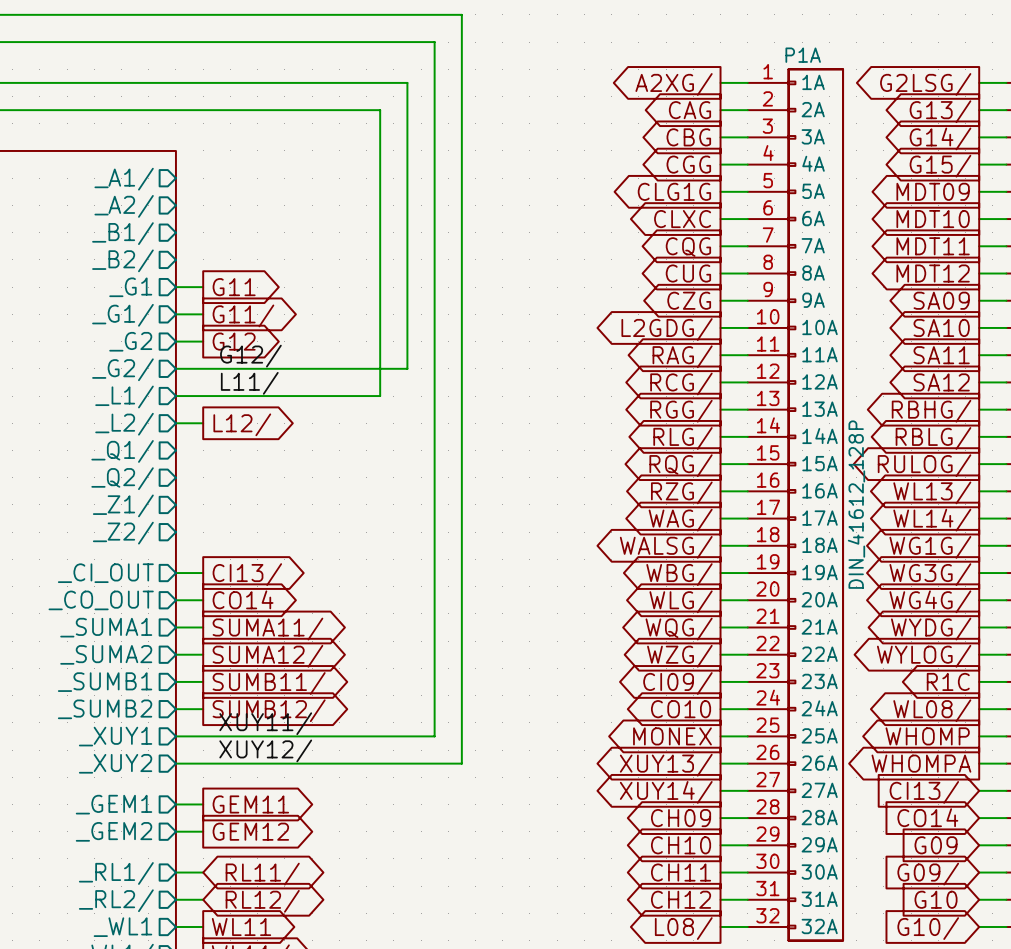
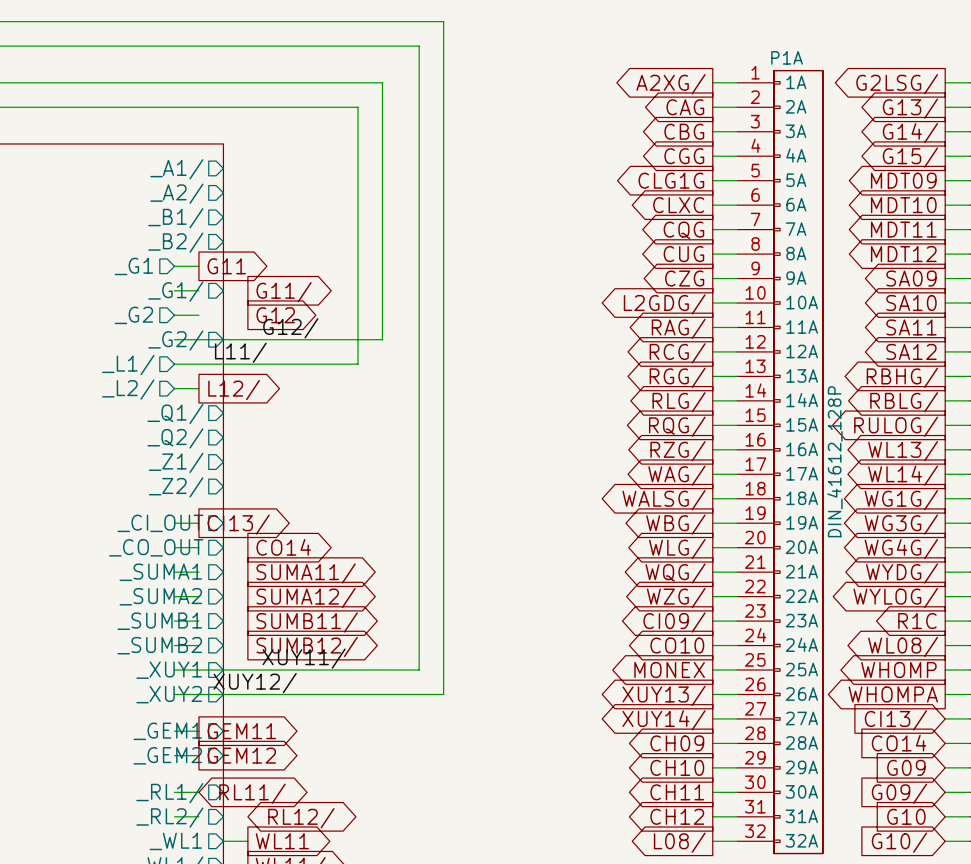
wire: (421, 14) (461, 14) (461, 763) (421, 763) -> (443, 21) (443, 694)
wire: (393, 42) (434, 42) (434, 736) (393, 736) -> (419, 46) (419, 670)
wire: (352, 82) (407, 82) (407, 368) (352, 368) -> (382, 82) (382, 339)
wire: (325, 110) (380, 110) (380, 396) (325, 396) -> (358, 107) (358, 364)
sheet pin position: _G1 (130, 287) -> _G1 (133, 266)
wire: (175, 287) (203, 287) -> (174, 266) (198, 266)
global label position: G11 (234, 287) -> G11 (226, 266)
wire: (175, 314) (203, 314) -> (174, 290) (198, 290)
sheet pin position: _G2 (130, 341) -> _G2 (133, 315)
wire: (175, 341) (203, 341) -> (174, 315) (198, 315)
wire: none -> (174, 339) (223, 339)
label position: L11/ (249, 383) -> L11/ (240, 352)
wire: none -> (174, 364) (223, 364)
sheet pin position: _L1/ (124, 396) -> _L1/ (128, 365)
wire: (175, 423) (203, 423) -> (174, 388) (198, 388)
sheet pin position: _L2/ (124, 424) -> _L2/ (128, 389)
global label position: L12/ (242, 424) -> L12/ (234, 390)
wire: (175, 573) (203, 573) -> (174, 523) (198, 523)
global label position: CI13/ (247, 574) -> CI13/ (238, 524)
wire: (175, 600) (203, 600) -> (174, 547) (198, 547)
wire: (175, 627) (203, 627) -> (174, 572) (198, 572)
wire: (175, 654) (203, 654) -> (174, 596) (198, 596)
wire: (175, 681) (203, 681) -> (174, 621) (198, 621)
wire: (175, 709) (203, 709) -> (174, 645) (198, 645)
wire: none -> (174, 670) (223, 670)
label position: XUY12/ (265, 750) -> XUY12/ (255, 683)
wire: none -> (174, 694) (223, 694)
wire: (175, 804) (203, 804) -> (174, 731) (198, 731)
global label position: GEM11 (250, 804) -> GEM11 (241, 731)
wire: (175, 831) (203, 831) -> (174, 755) (198, 755)
global label position: GEM12 (250, 831) -> GEM12 (241, 755)
wire: (175, 872) (203, 872) -> (174, 792) (198, 792)
global label position: RL11/ (262, 874) -> RL11/ (252, 793)
wire: (175, 899) (203, 899) -> (174, 816) (198, 816)

